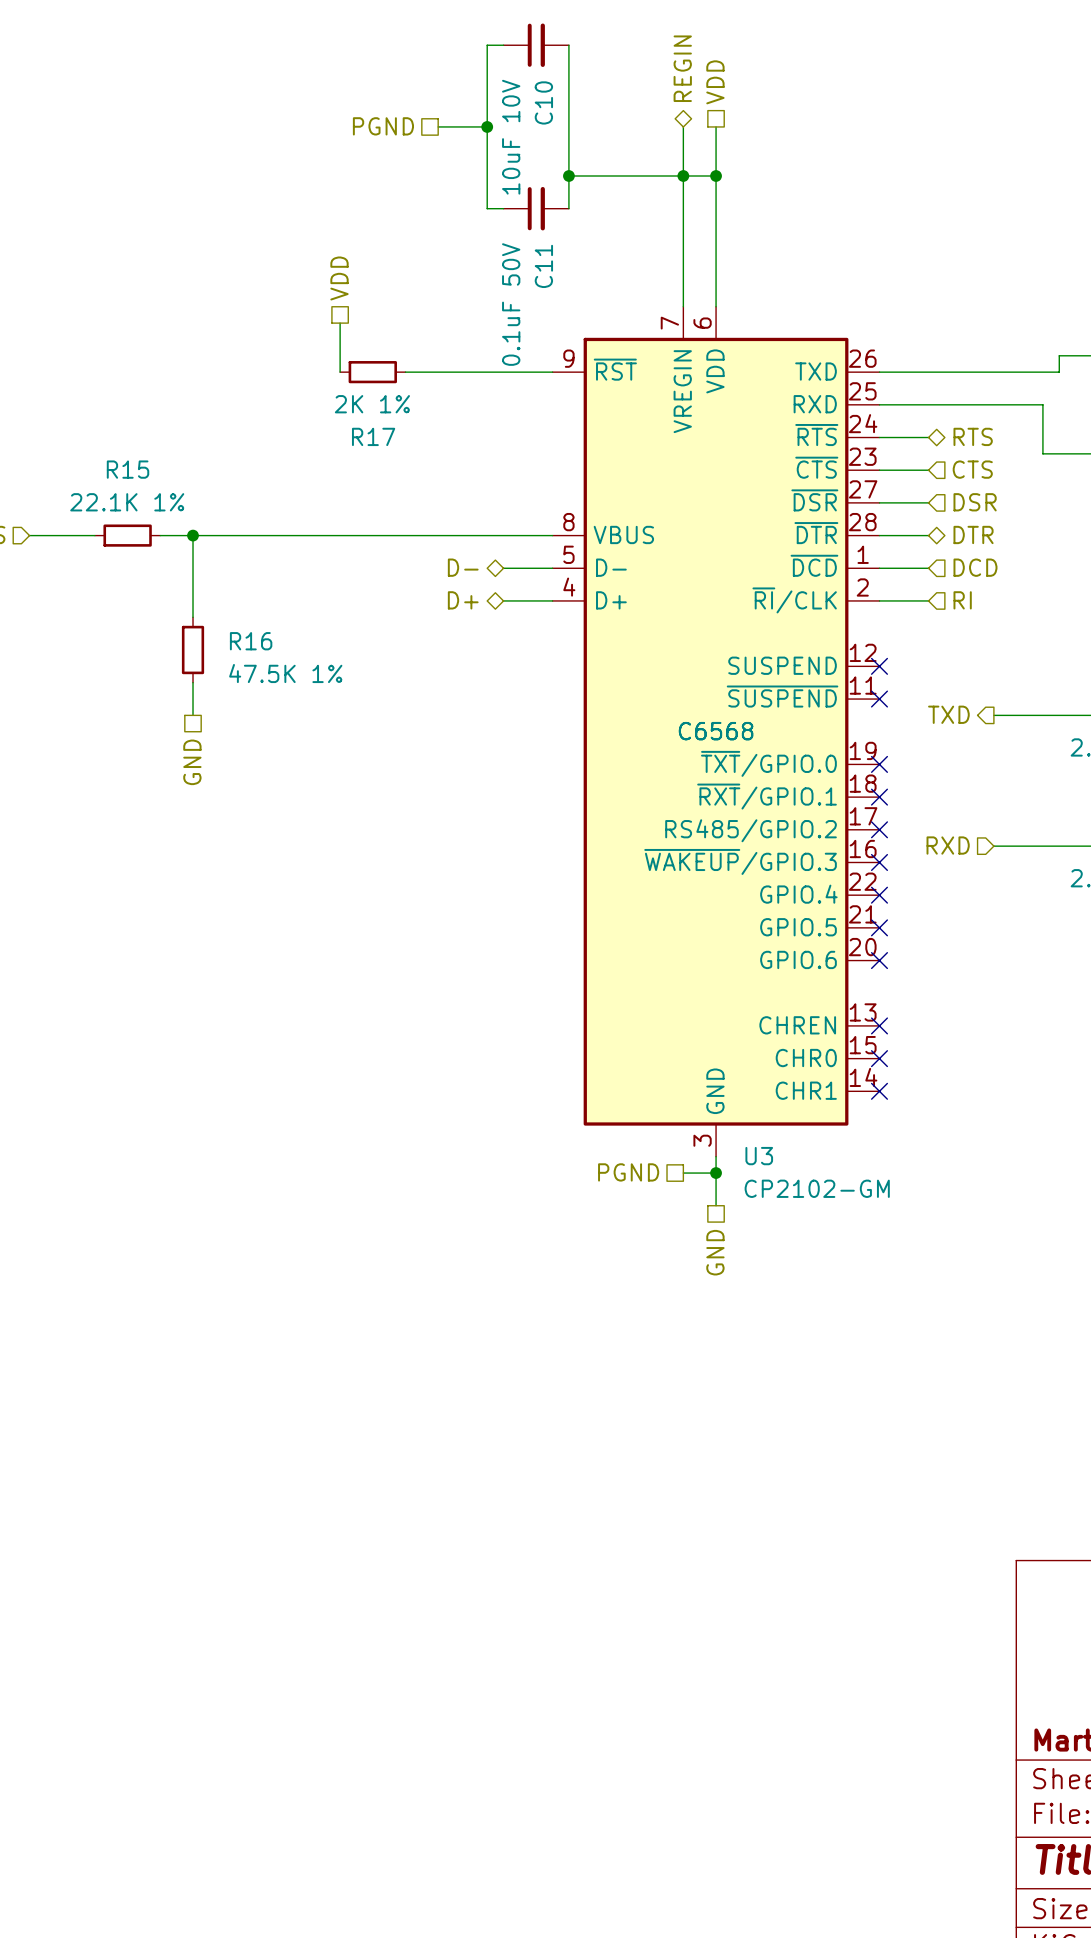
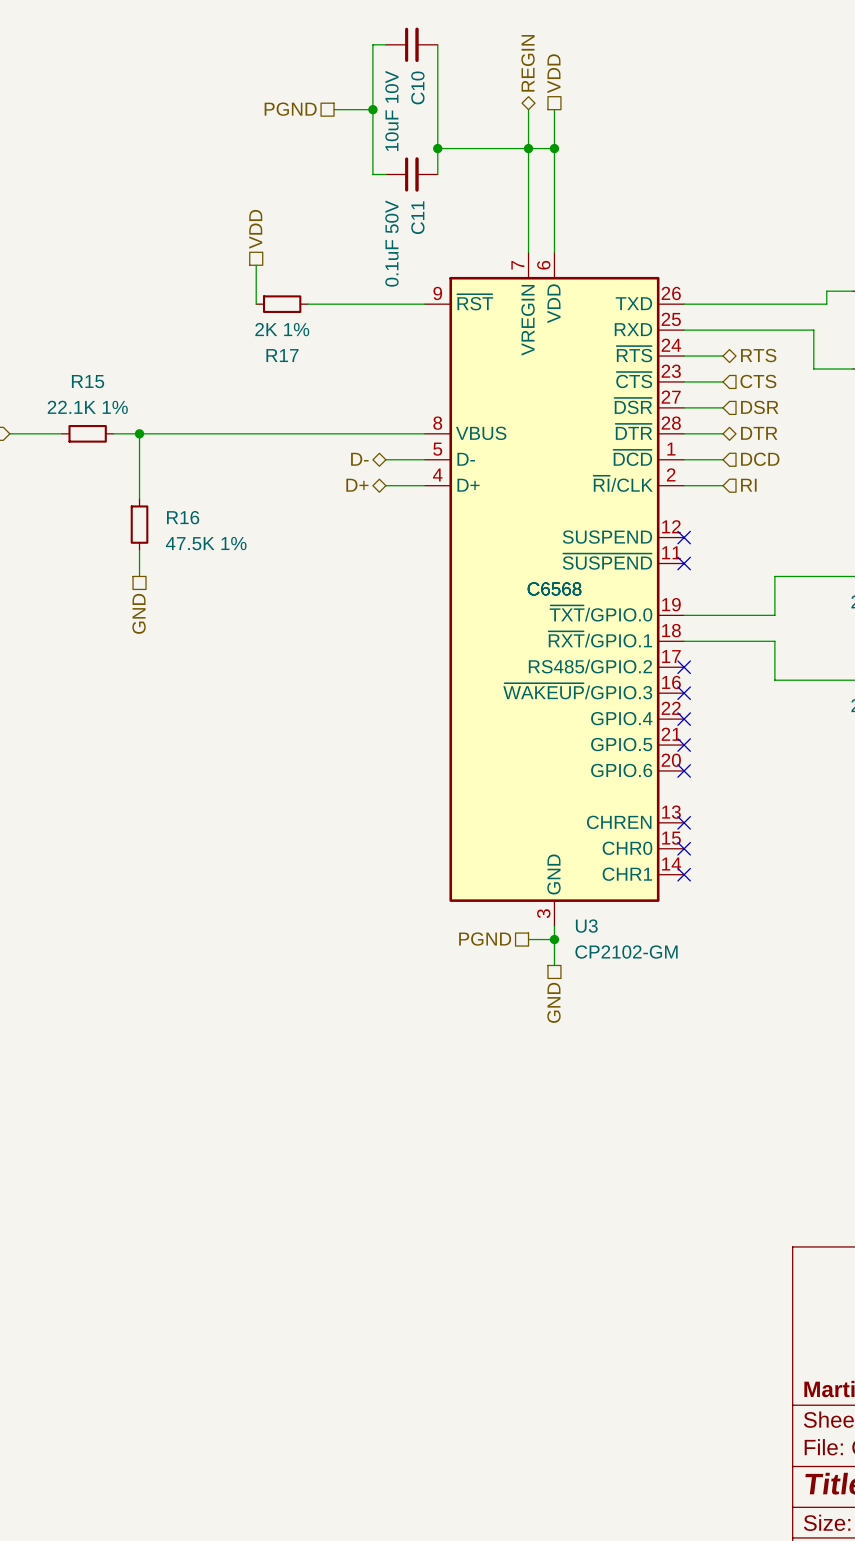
hierarchical label: TXD (948, 714) -> none
wire: none -> (774, 576) (774, 615) (684, 615)
no-connect mark: (879, 764) -> none
wire: none -> (684, 641) (774, 641) (774, 680)
no-connect mark: (879, 797) -> none
hierarchical label: RXD (948, 845) -> none

